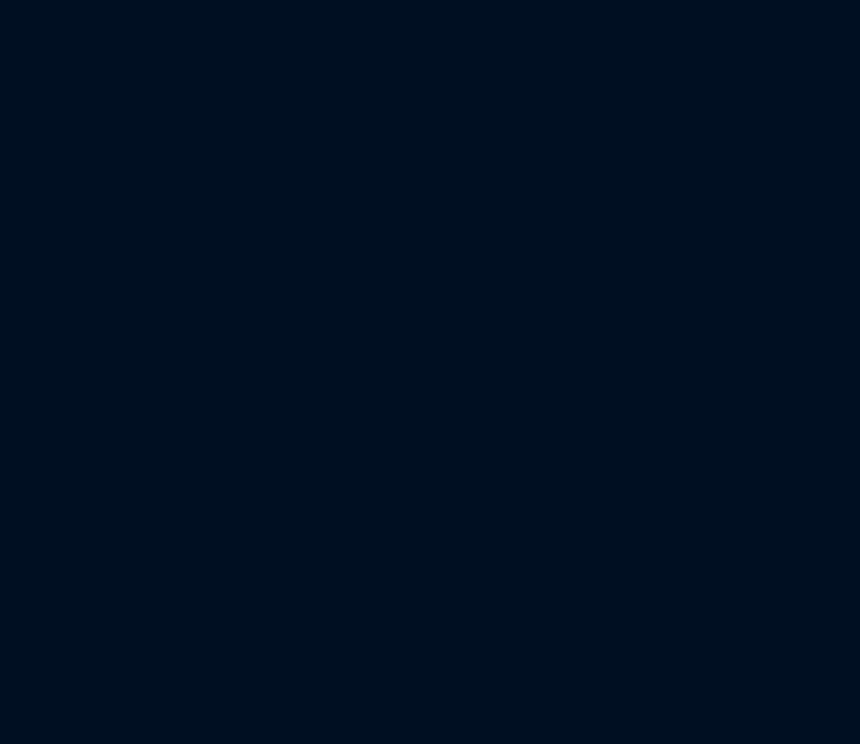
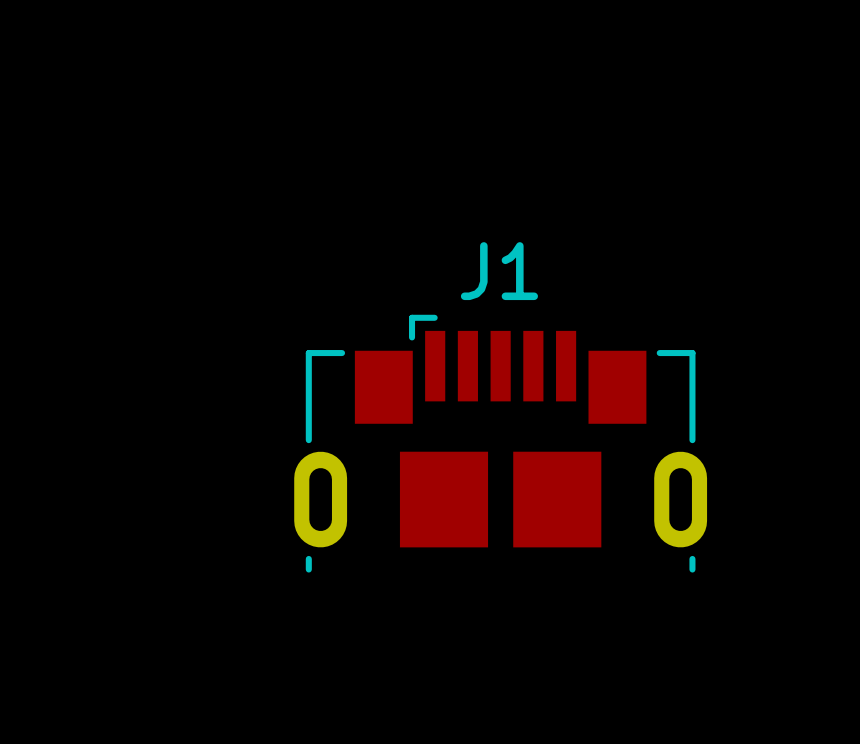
J1: none -> (500, 443)

